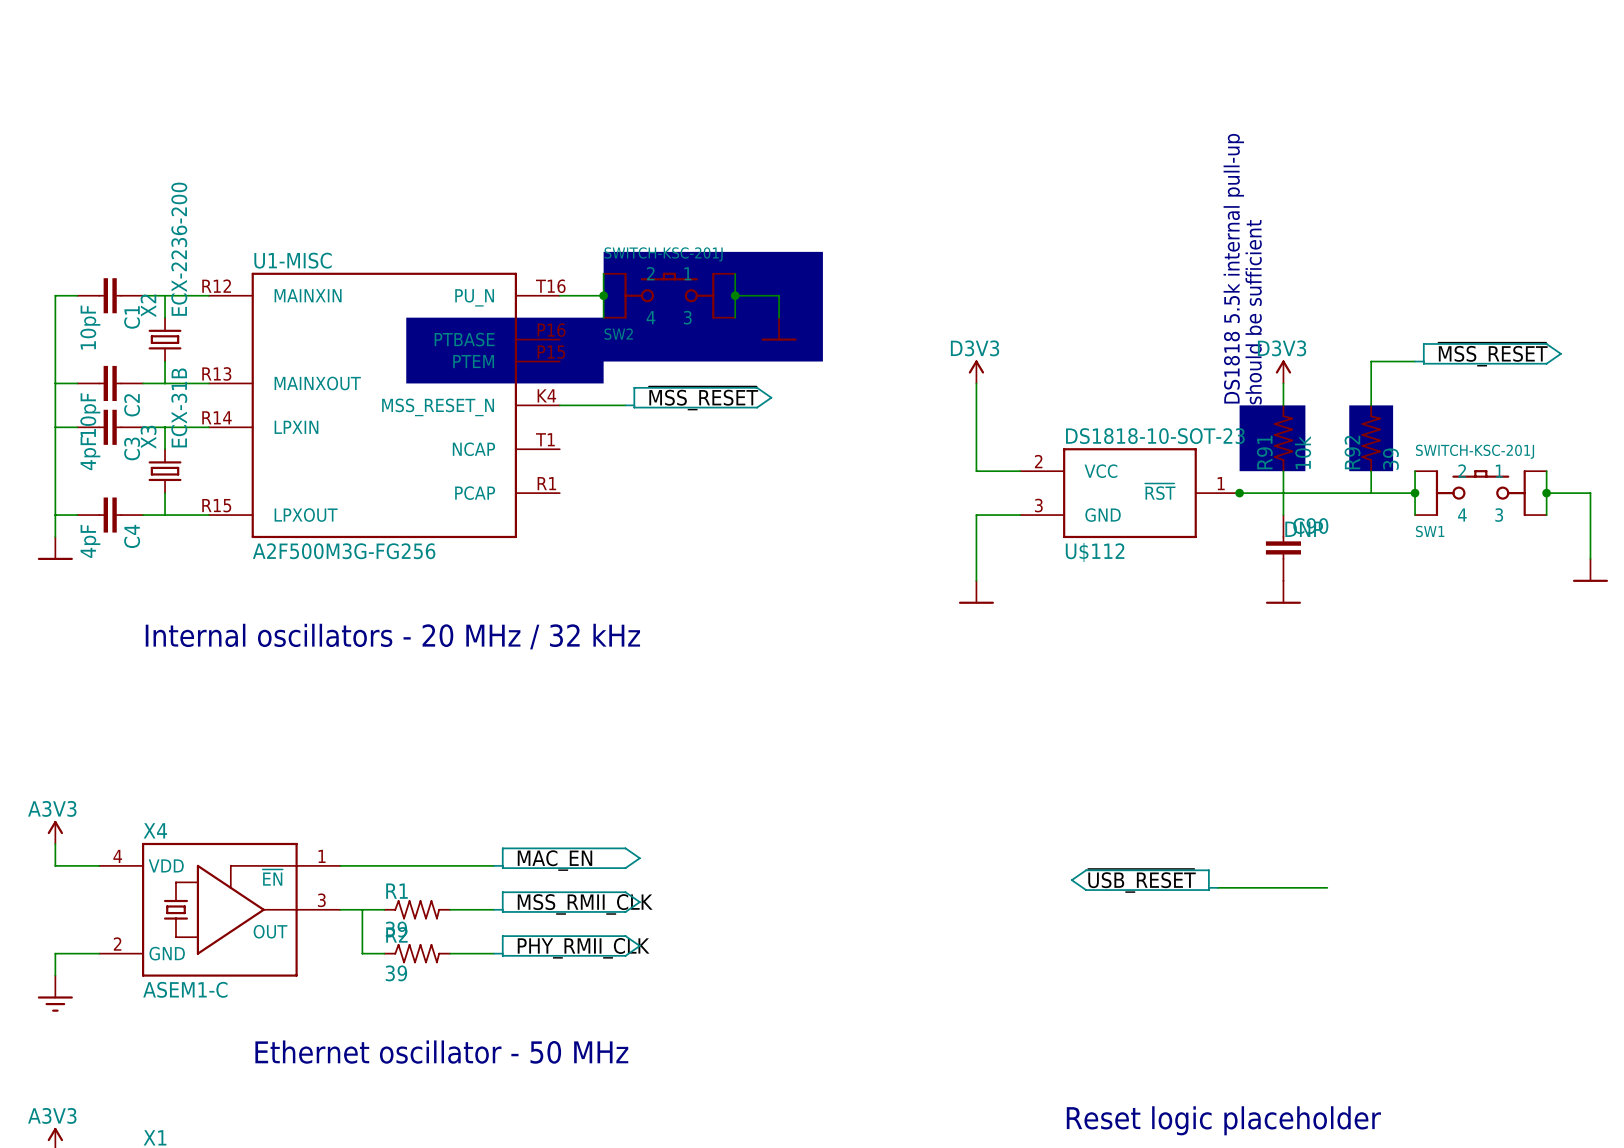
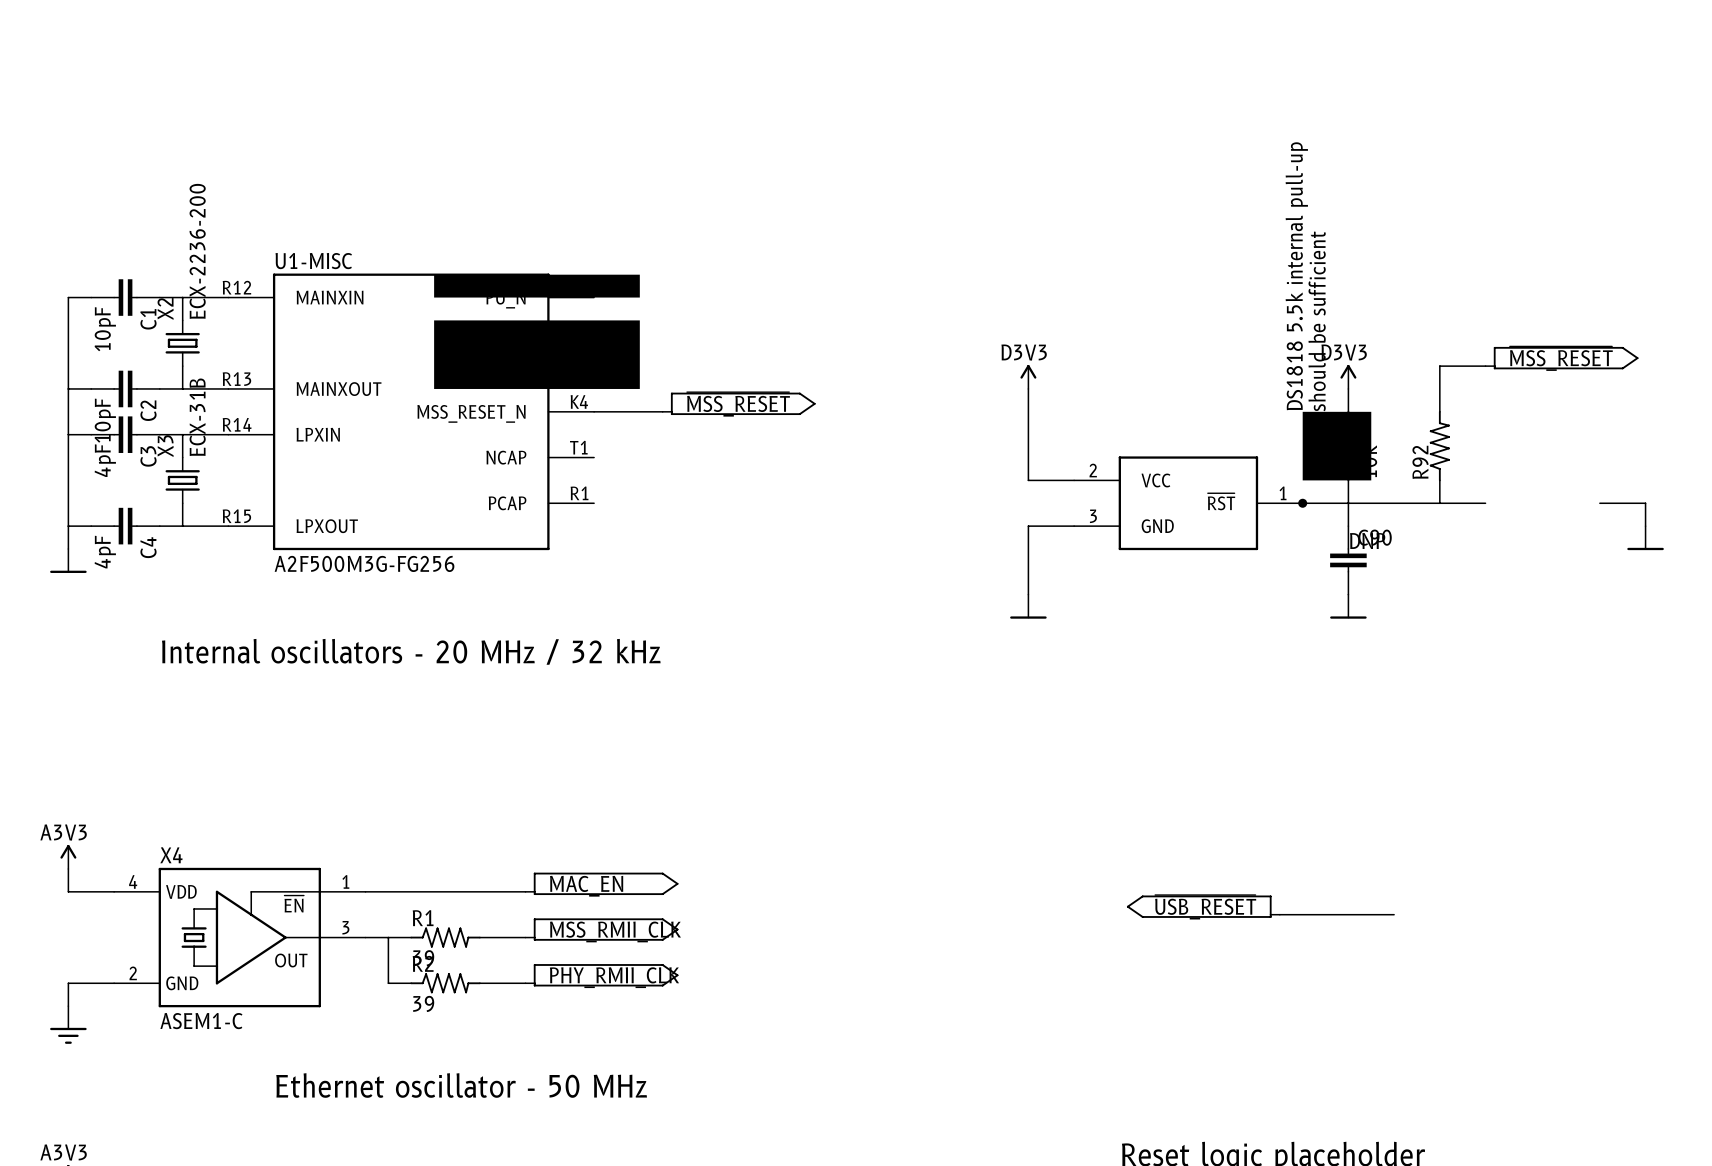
drawing: [603, 251, 823, 362] -> none
drawing: none -> [434, 274, 640, 298]
wire: (603, 273) (603, 317) -> none
wire: (735, 273) (735, 317) -> none
junction: (603, 295) -> none
SW2: SWITCH-KSC-201J (669, 295) -> none
wire: (735, 295) (779, 295) (779, 317) -> none
junction: (735, 295) -> none
power symbol: (779, 329) -> none
drawing: [1349, 405, 1394, 472] -> none
U$112 value: DS1818-10-SOT-23 (1155, 436) -> none
R92 value: 39 (1390, 459) -> none
wire: (1415, 471) (1415, 515) -> none
wire: (1546, 471) (1546, 515) -> none
junction: (1415, 493) -> none
SW1: SWITCH-KSC-201J (1480, 493) -> none
wire: none -> (1599, 503) (1622, 503)
junction: (1546, 493) -> none
wire: (1568, 493) (1590, 493) (1590, 558) -> (1645, 503) (1645, 526)
U$112 name: U$112 (1095, 552) -> none
power symbol position: (1590, 570) -> (1645, 538)

